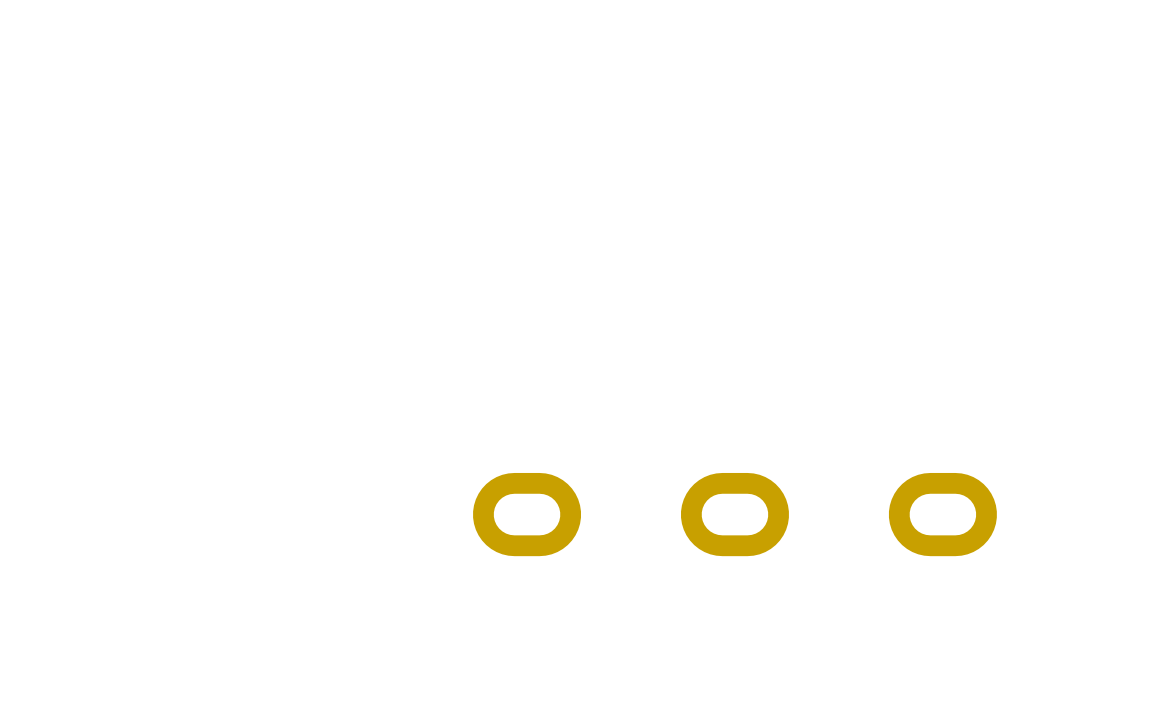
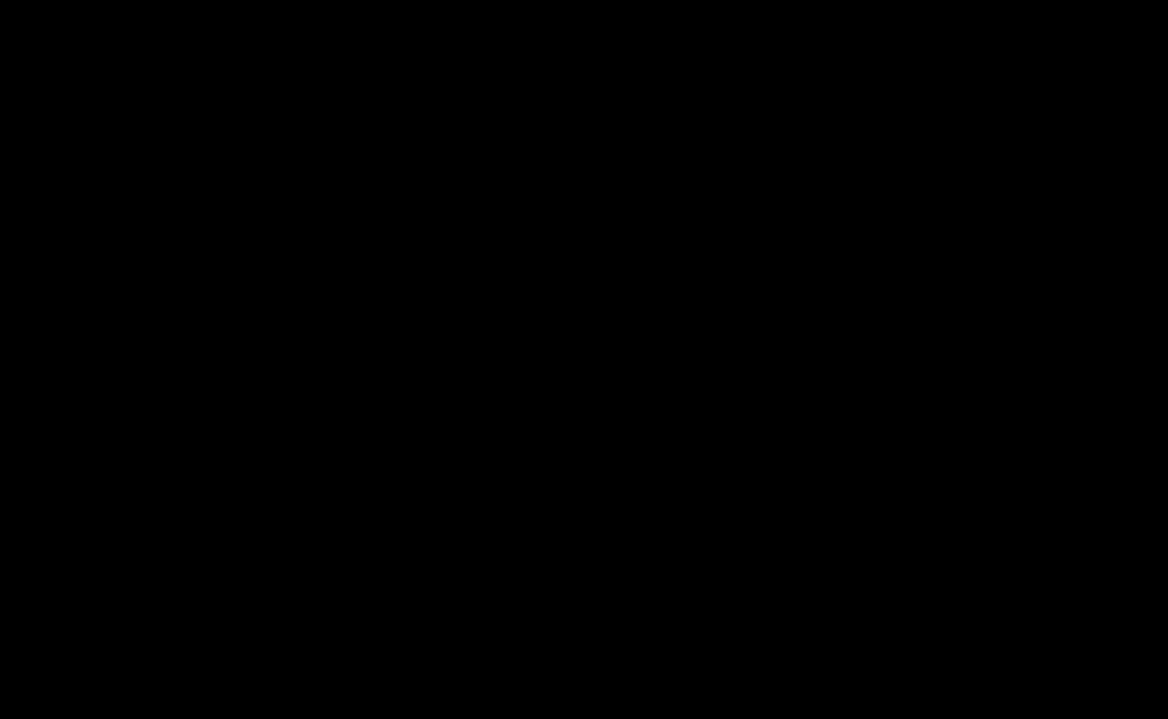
part: (734, 514) -> none

